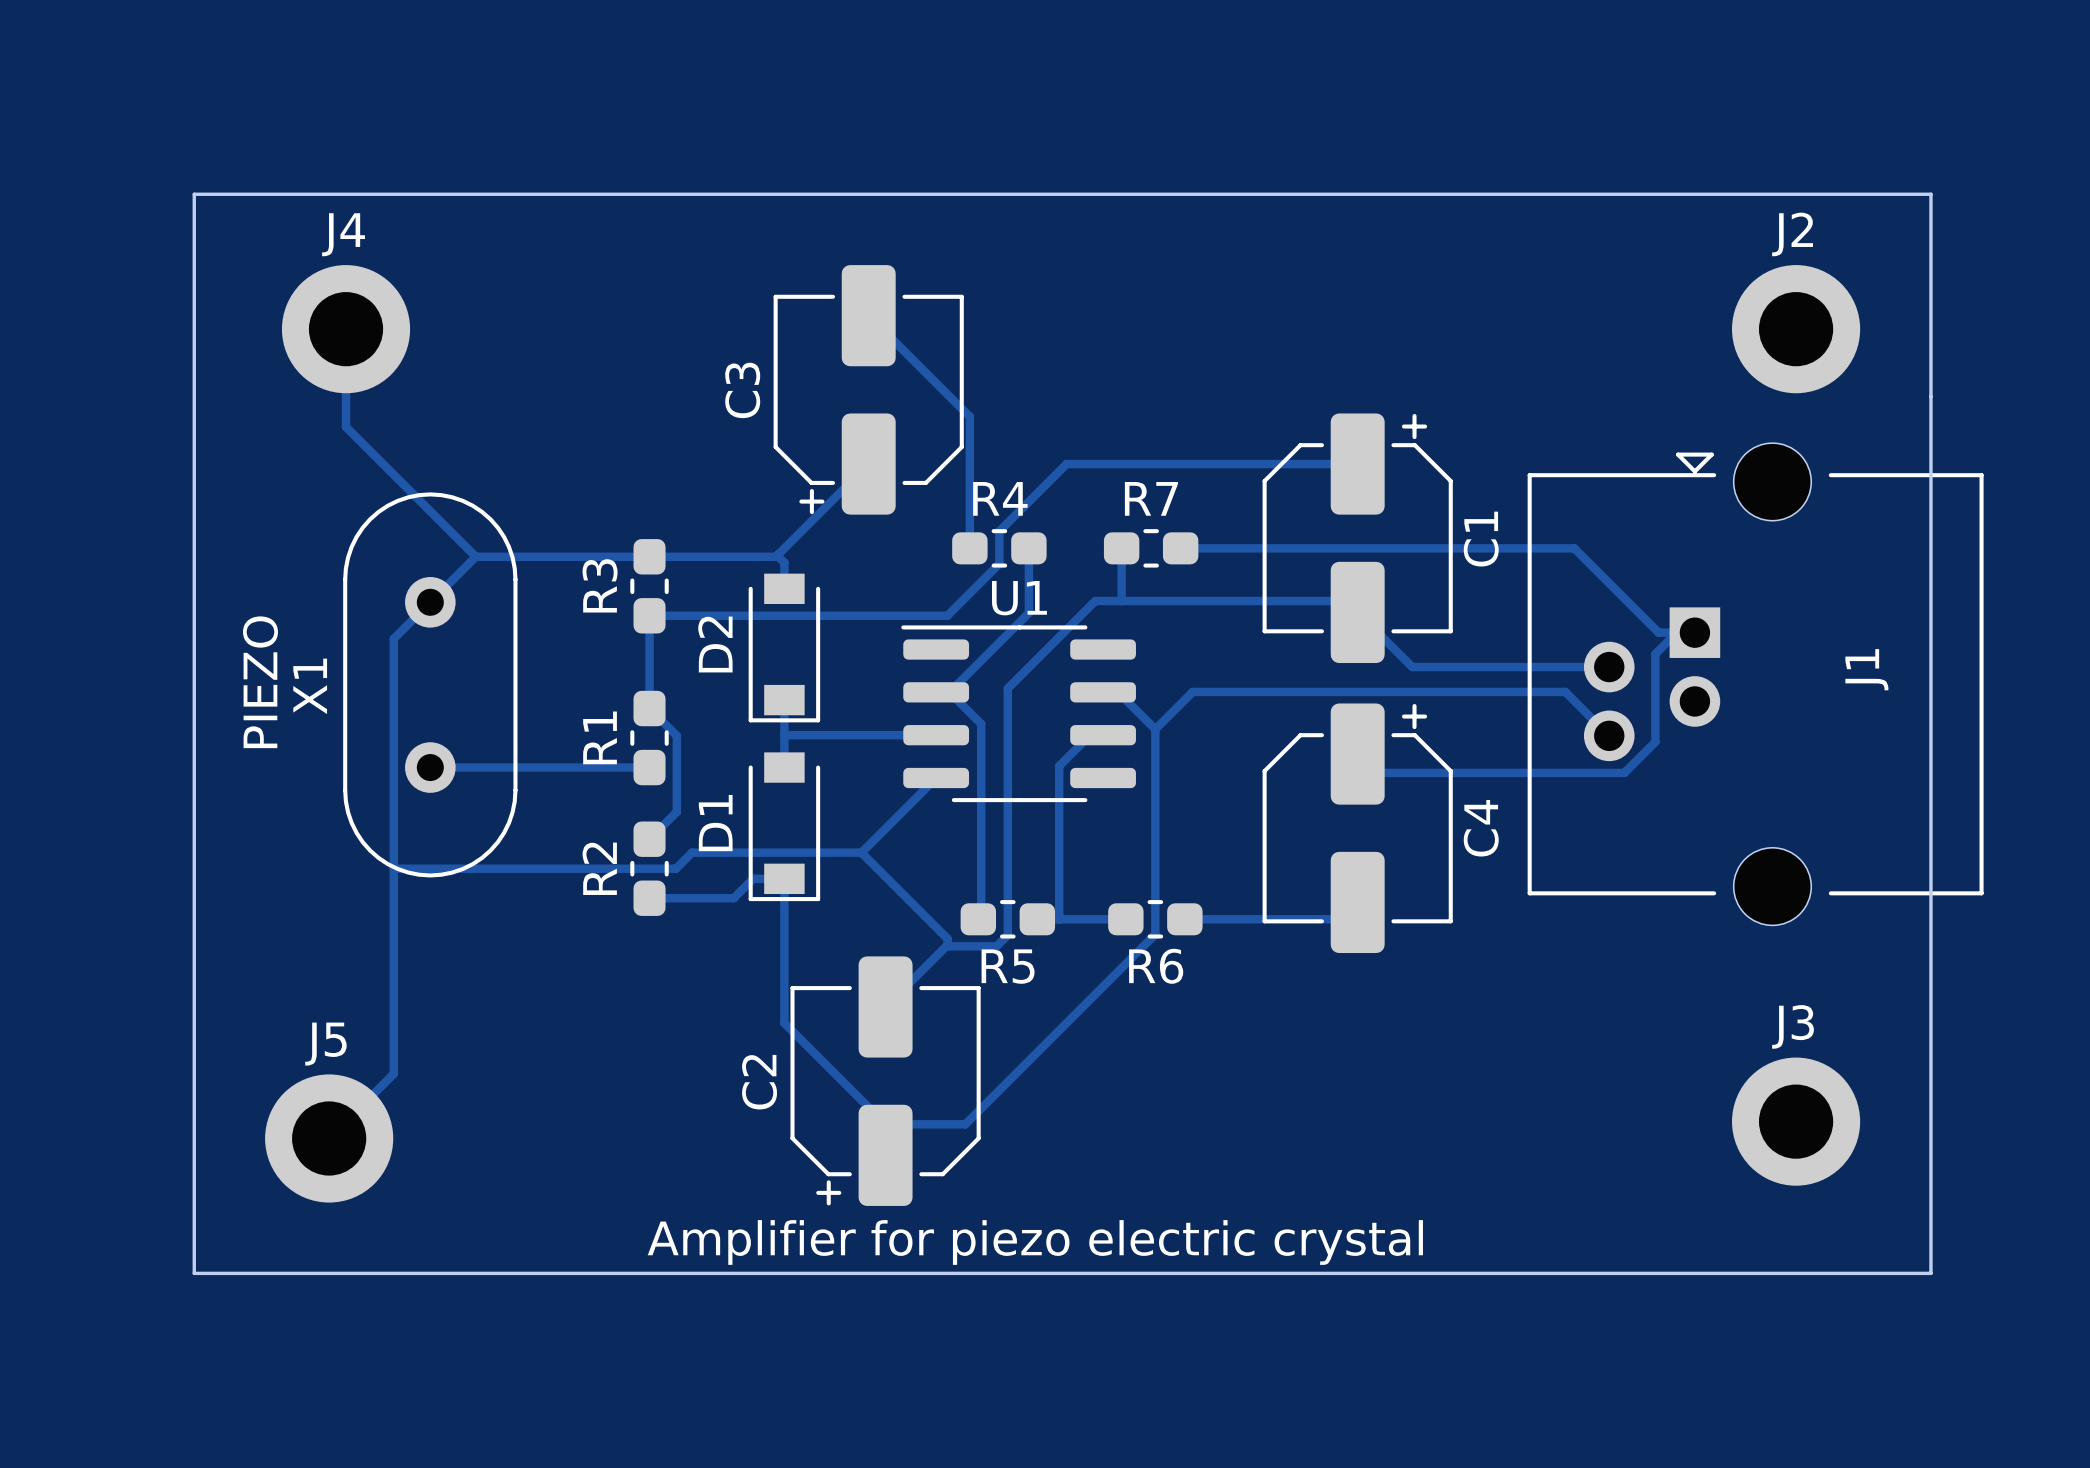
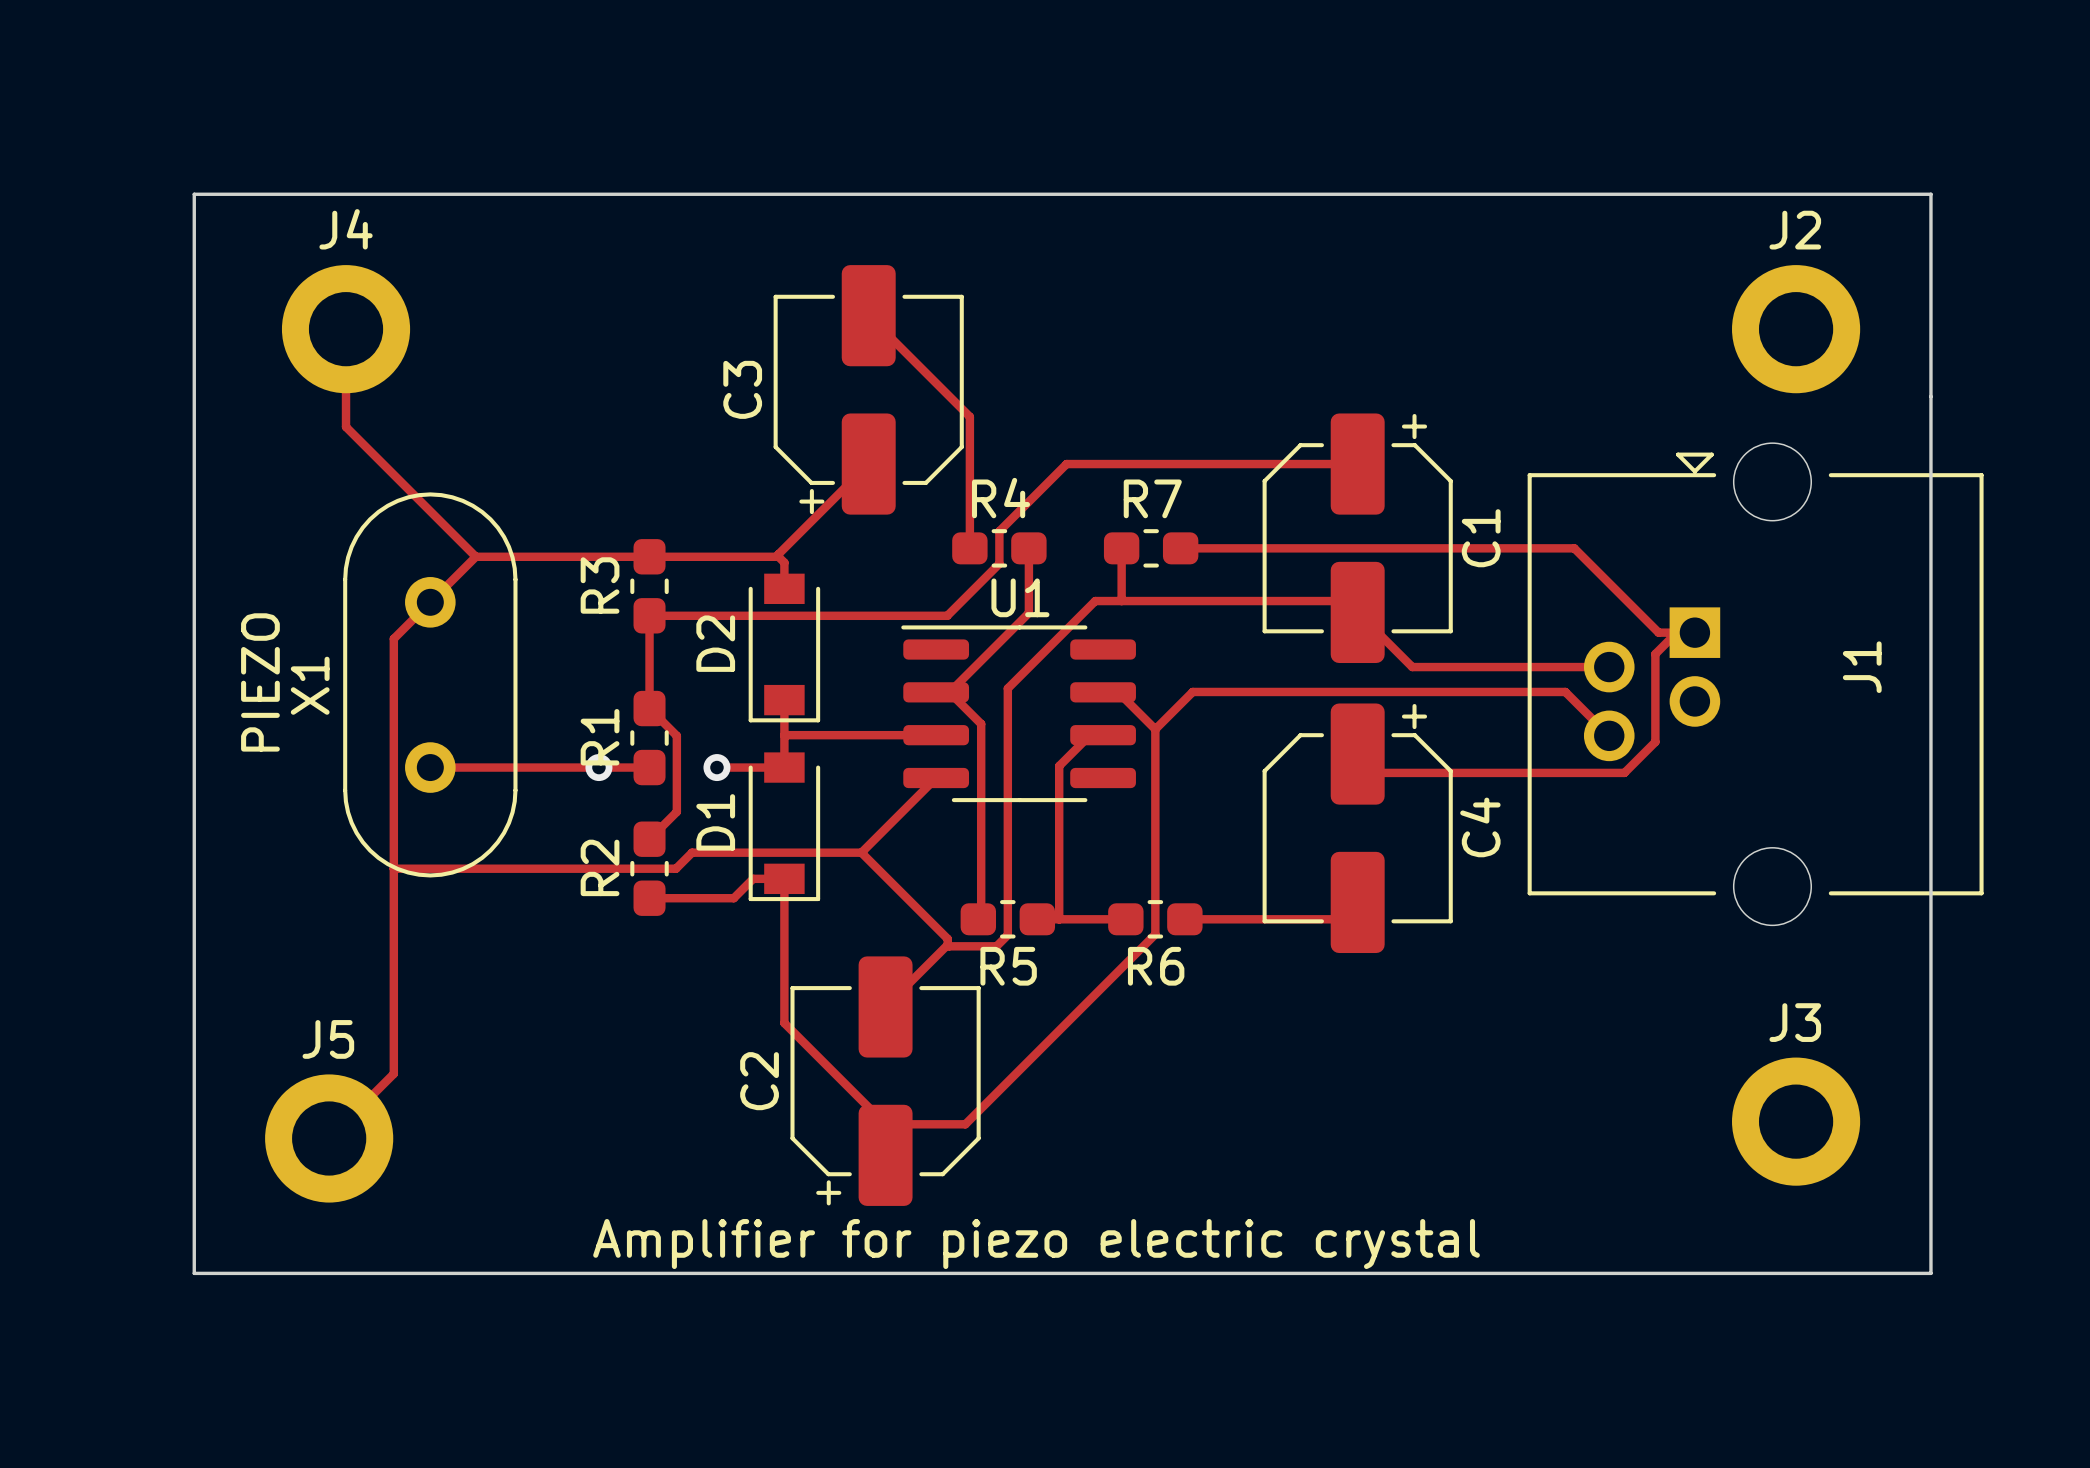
via: none -> (598, 767)
track: none -> (716, 767) (784, 767)
via: none -> (716, 767)

